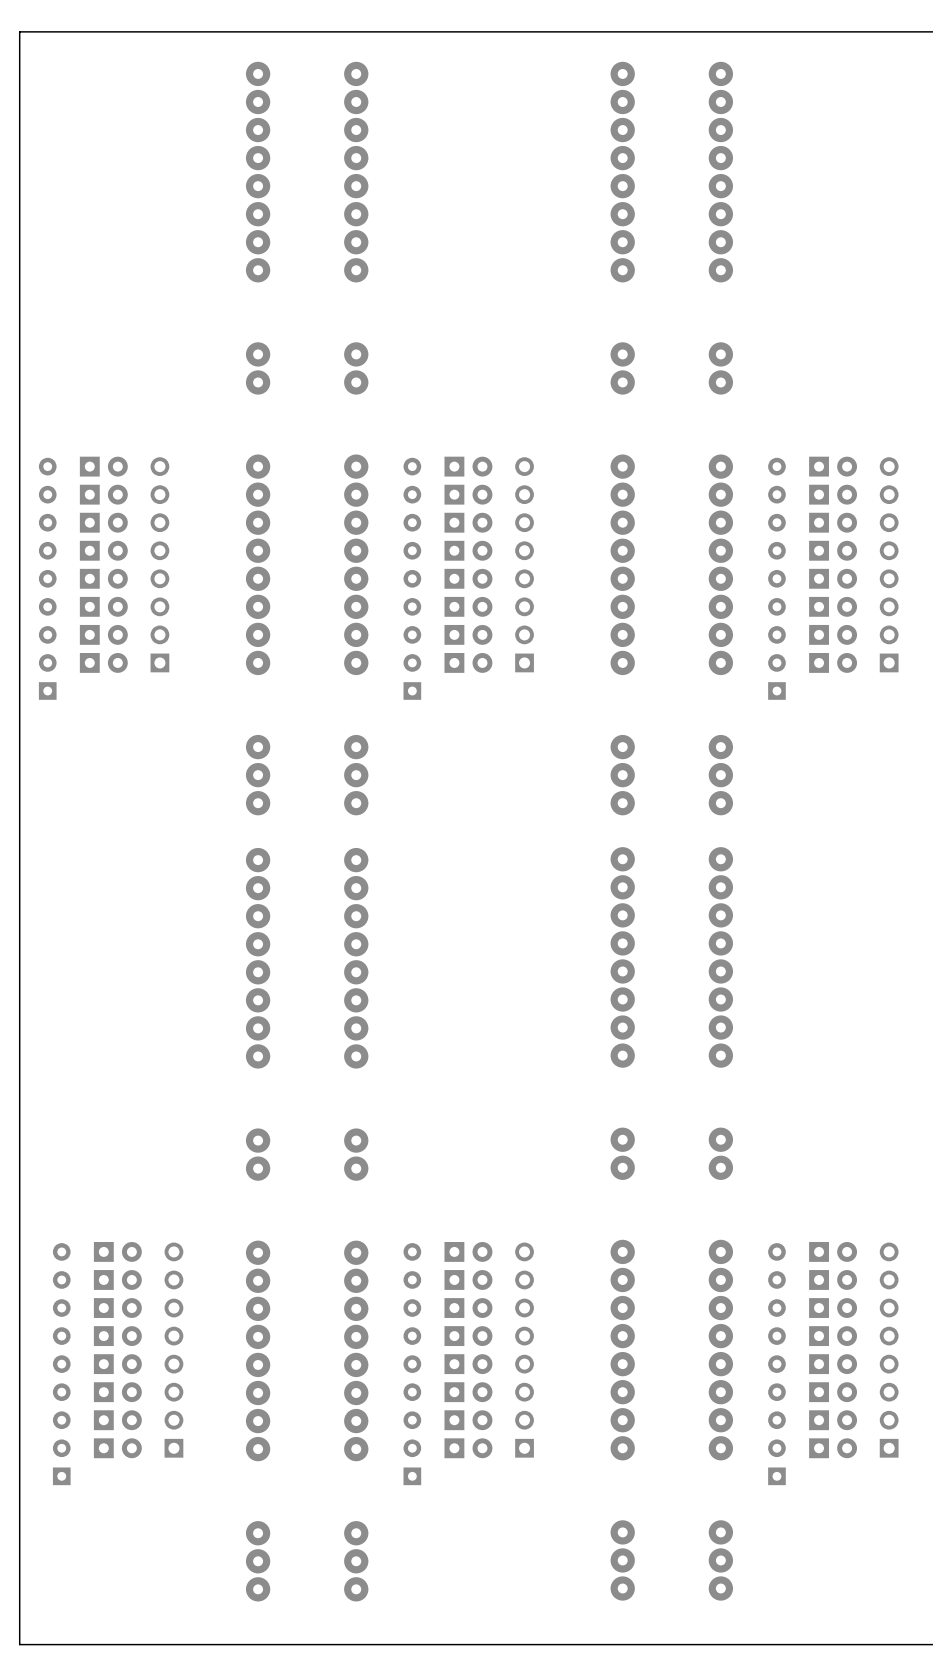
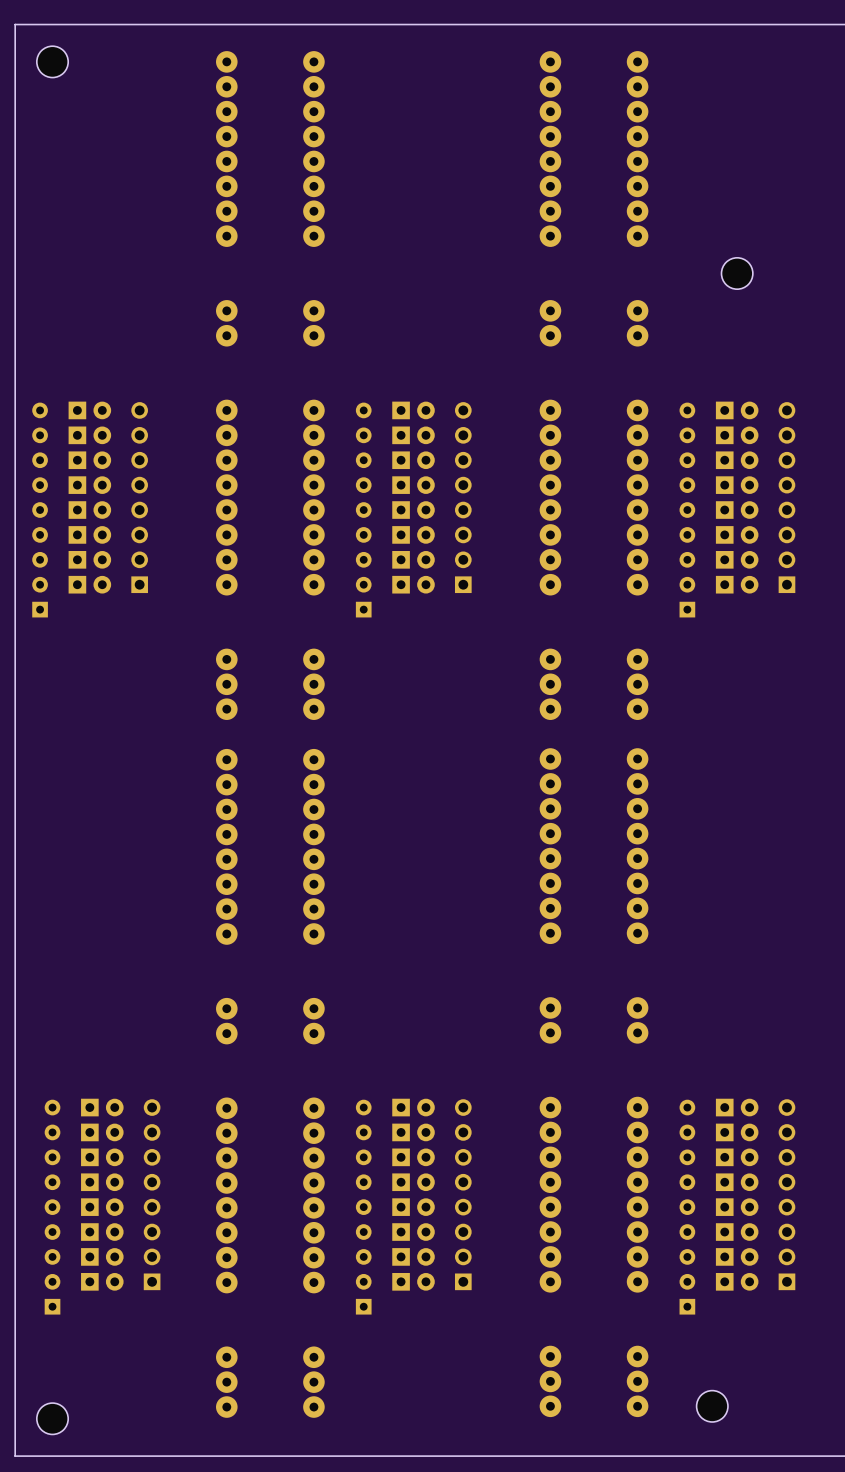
part: none -> (52, 61)
part: none -> (737, 273)
part: none -> (712, 1406)
part: none -> (52, 1418)

